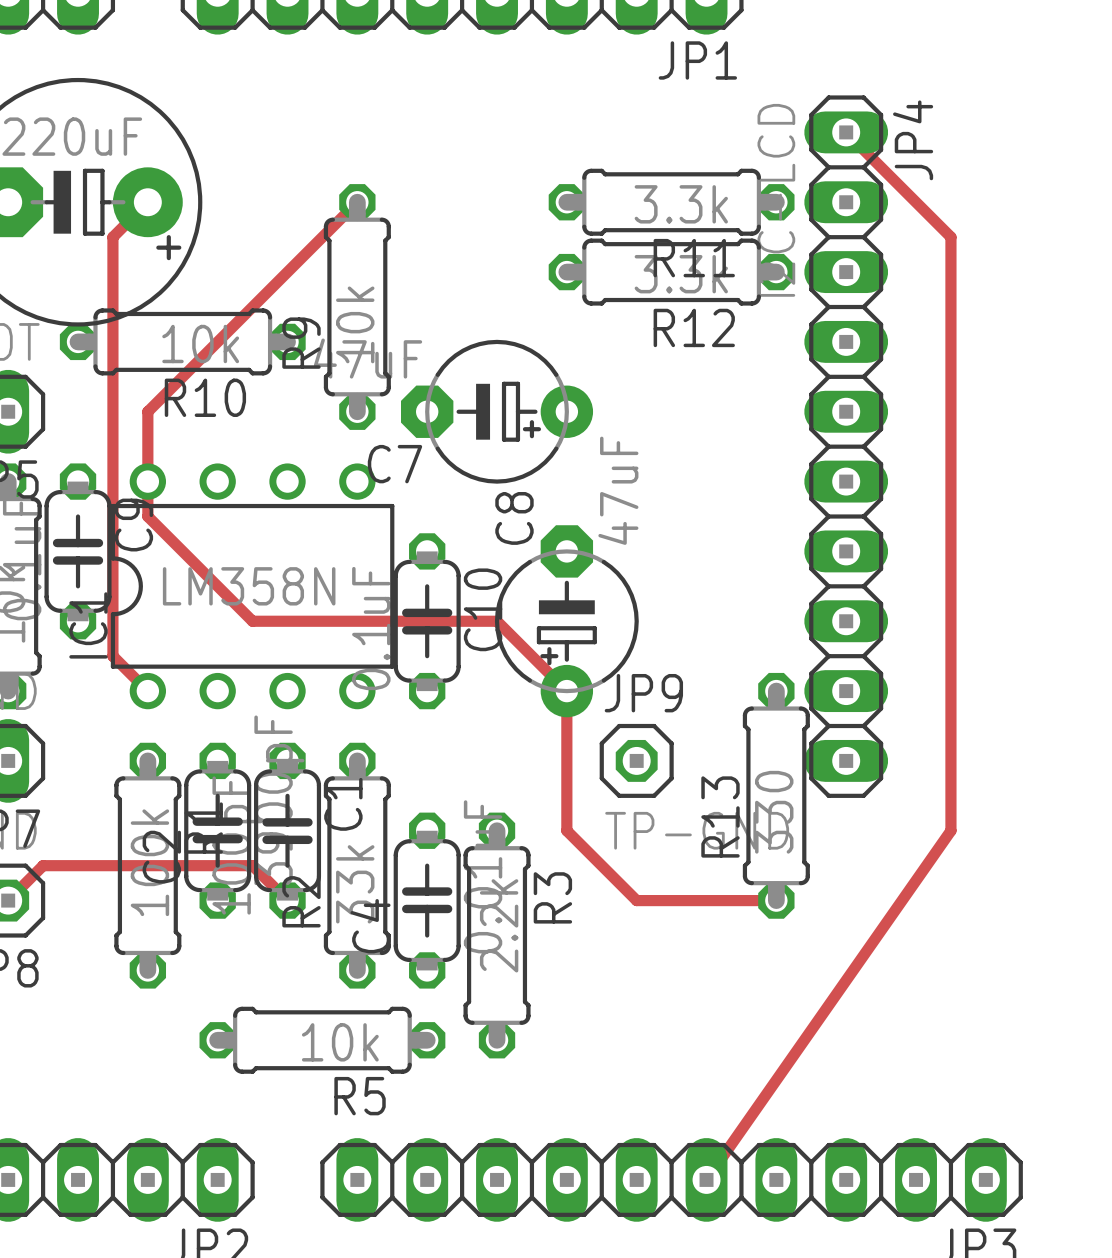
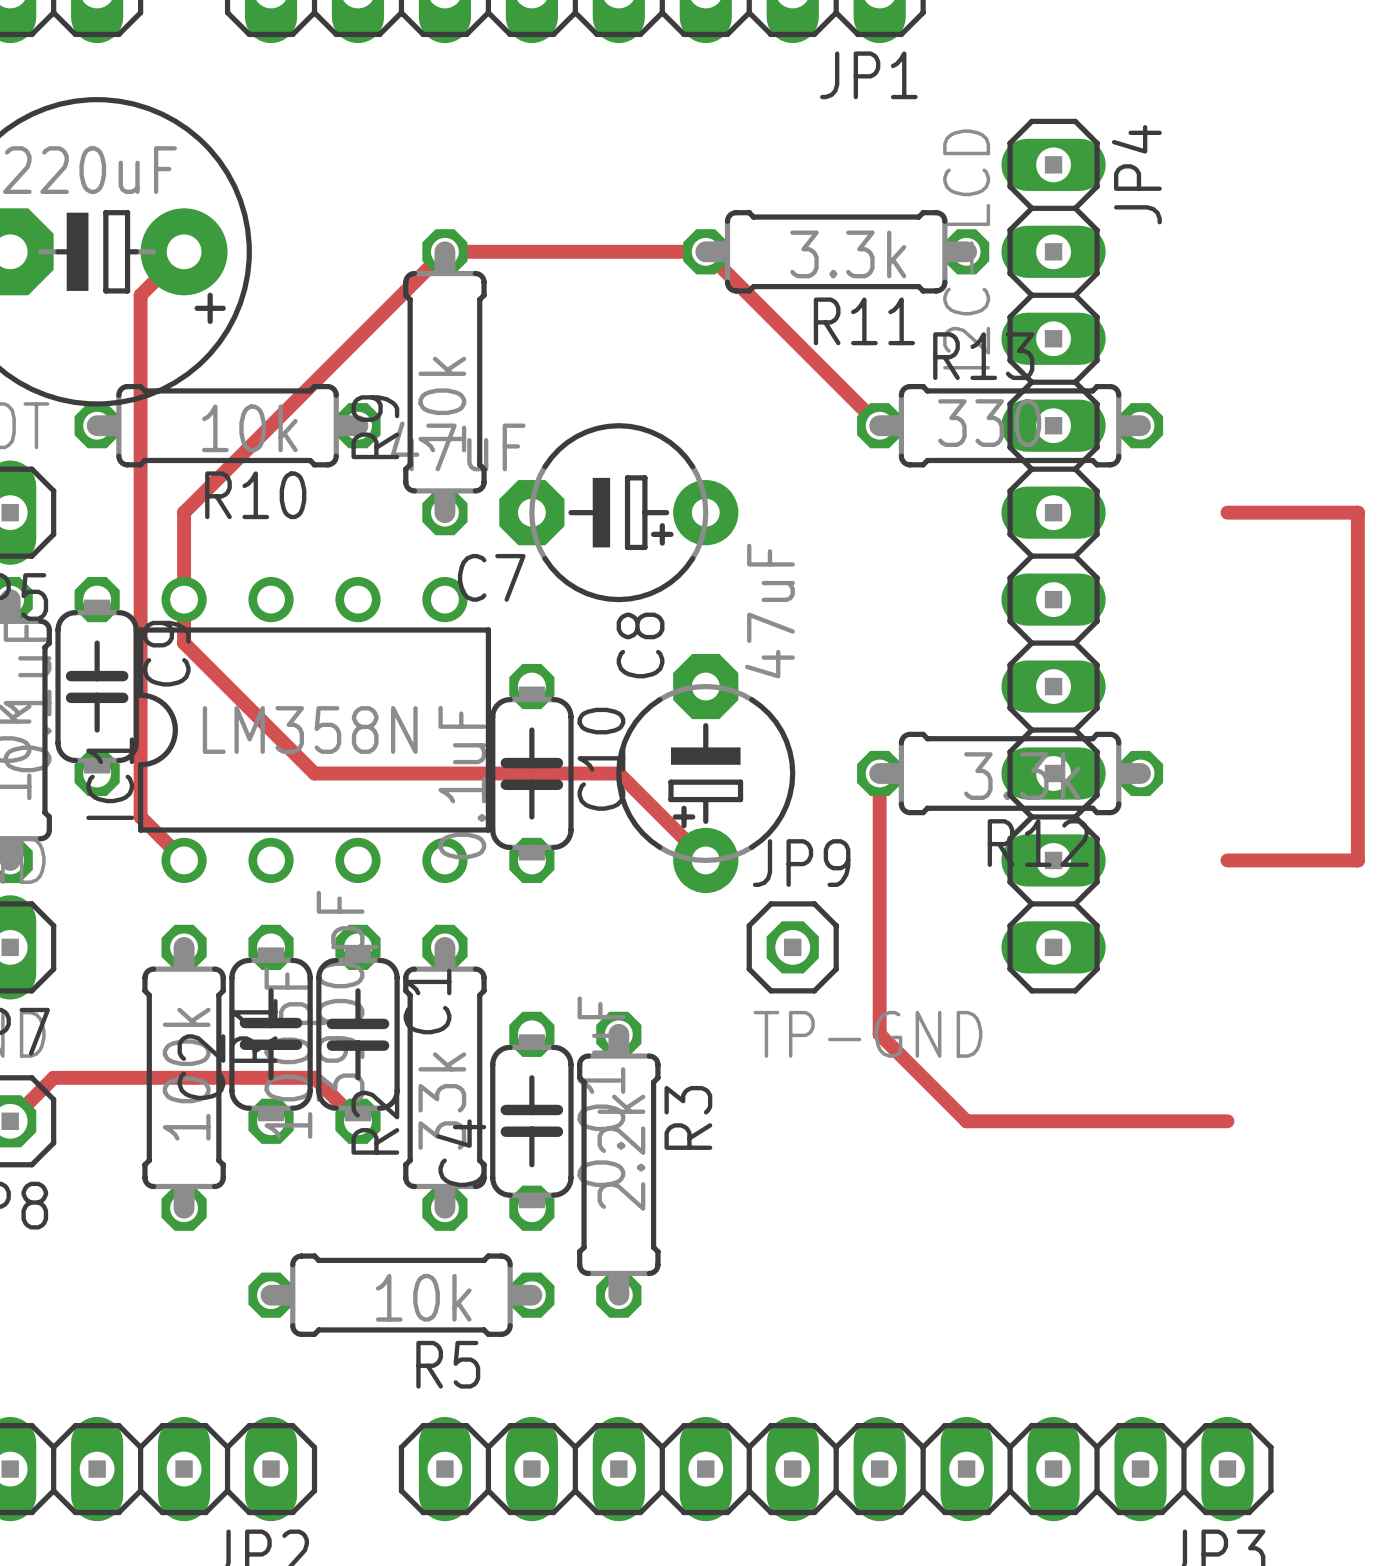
track: (846, 132) (950, 237) (950, 830) (706, 1179) -> none
track: none -> (444, 251) (705, 251) (879, 425)
R12 position: (671, 272) -> (1010, 773)
track: none -> (1227, 512) (1357, 512) (1357, 860) (1227, 860)
track: none -> (879, 773) (879, 1034) (966, 1121) (1227, 1121)
track: (566, 691) (566, 830) (636, 900) (776, 900) -> none
R13 rotation: 0° (776, 795) -> 90° clockwise (1010, 425)
R13 position: (776, 795) -> (1010, 425)

